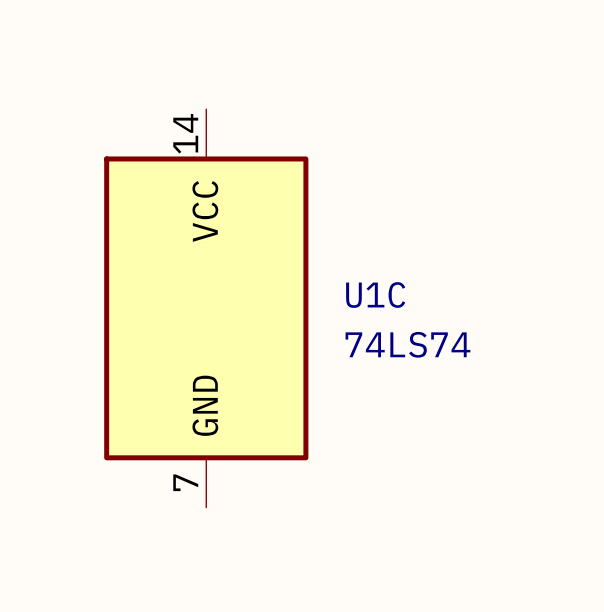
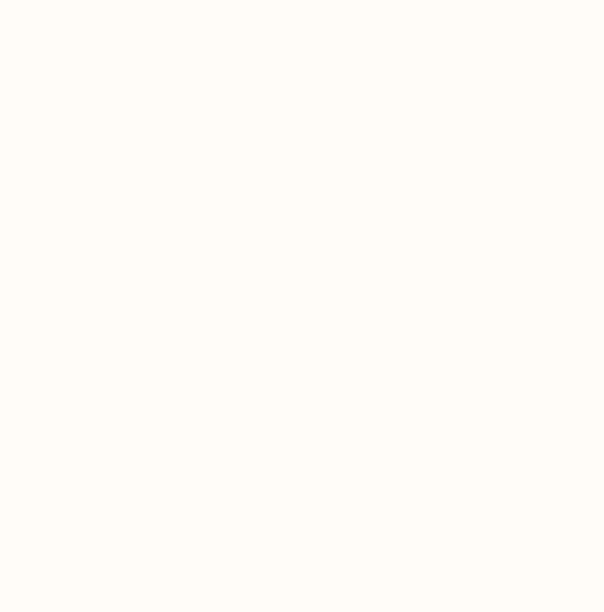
U1C: 74LS74 (206, 308) -> none

